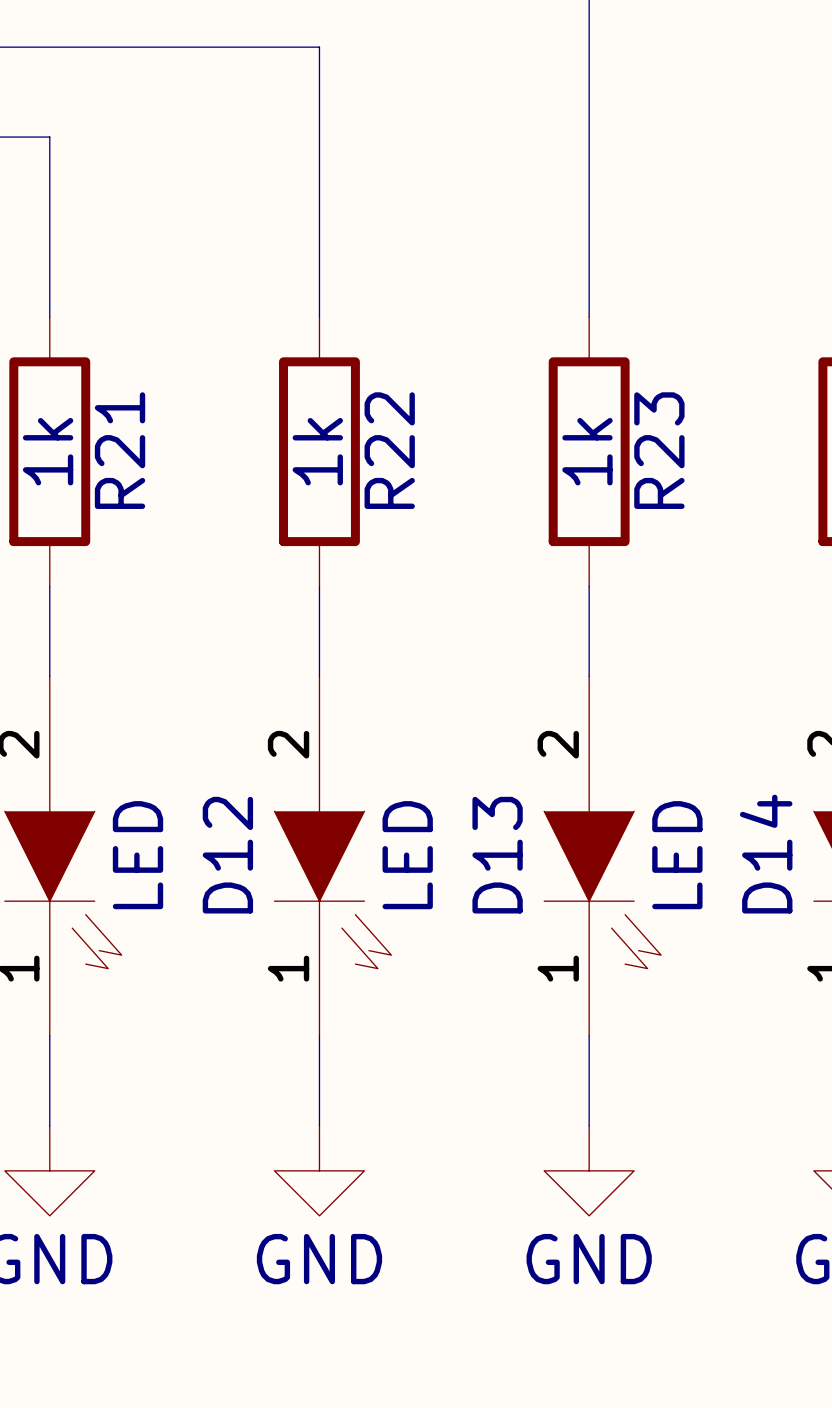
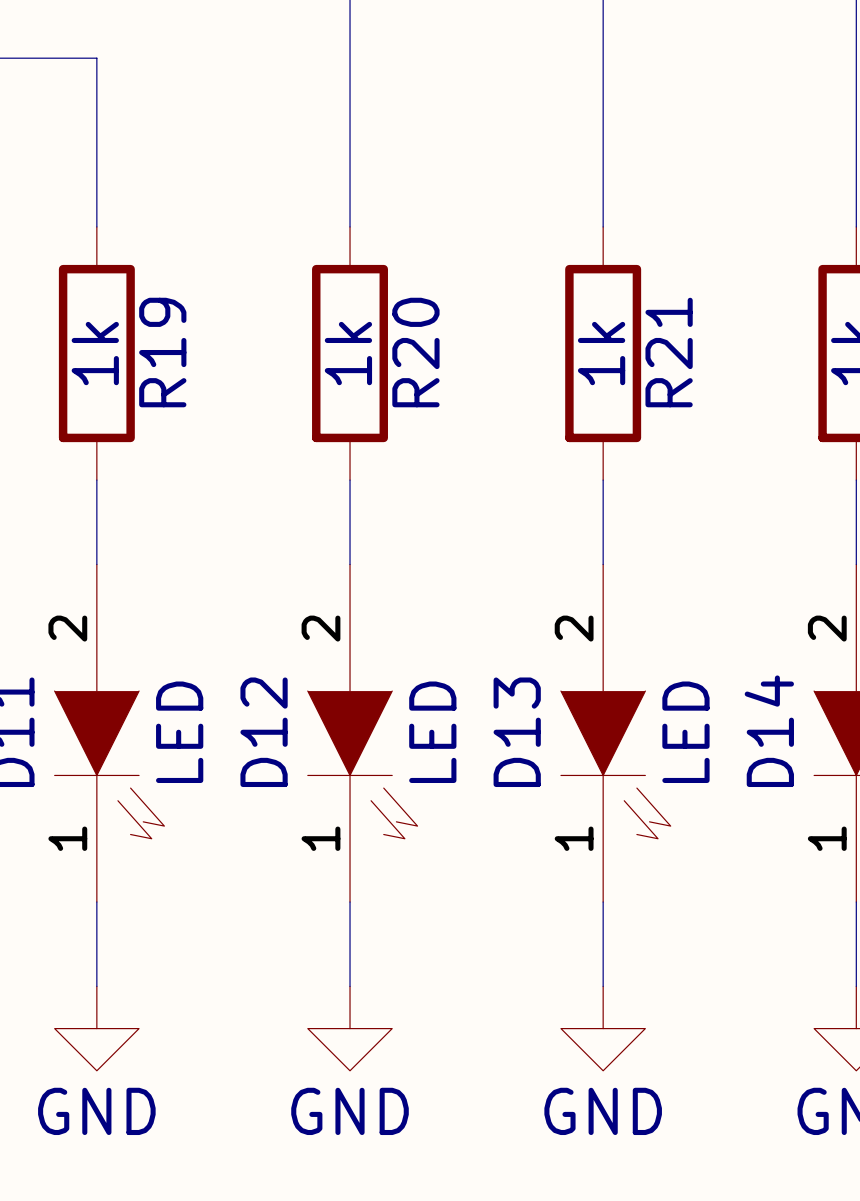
R21 name: R21 (120, 450) -> R19 (162, 352)
R22 name: R22 (389, 450) -> R20 (415, 352)
R23 name: R23 (659, 450) -> R21 (669, 352)

